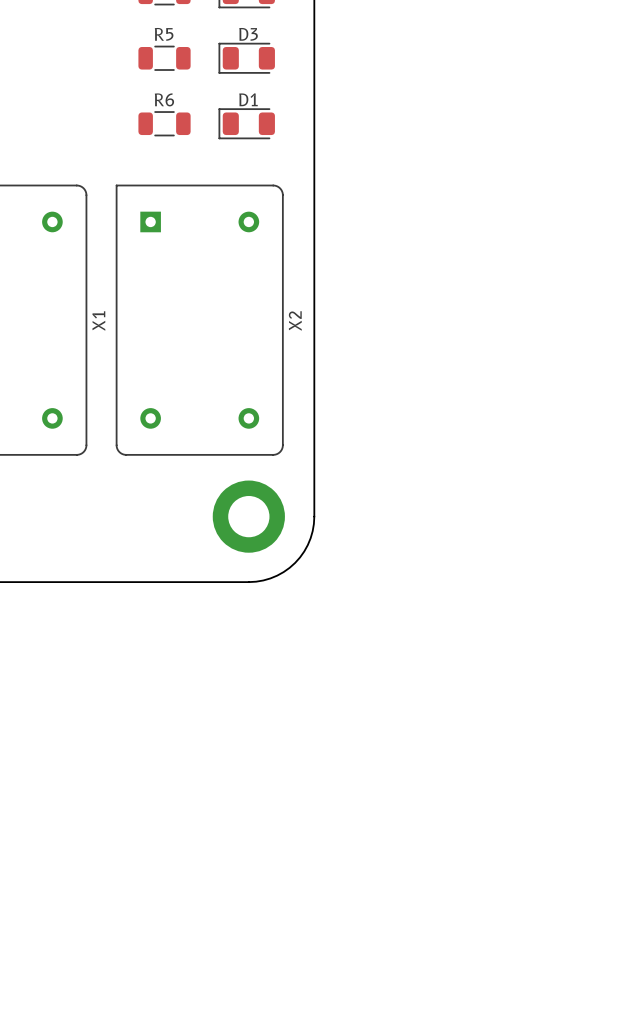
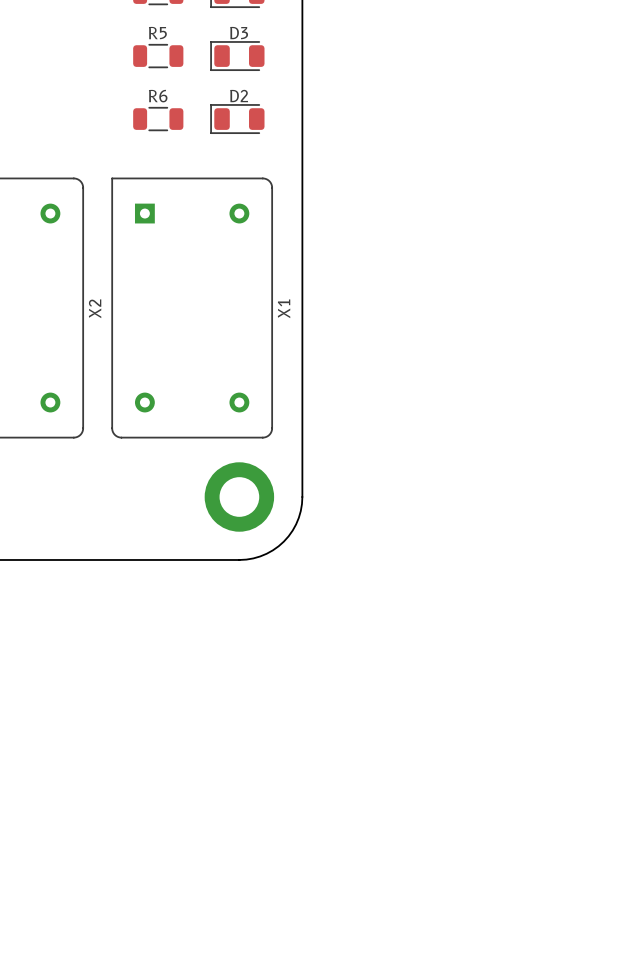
D1 name: D1 (248, 99) -> D2 (239, 96)
X1 name: X1 (98, 321) -> X2 (95, 308)
X2 name: X2 (295, 321) -> X1 (284, 308)

